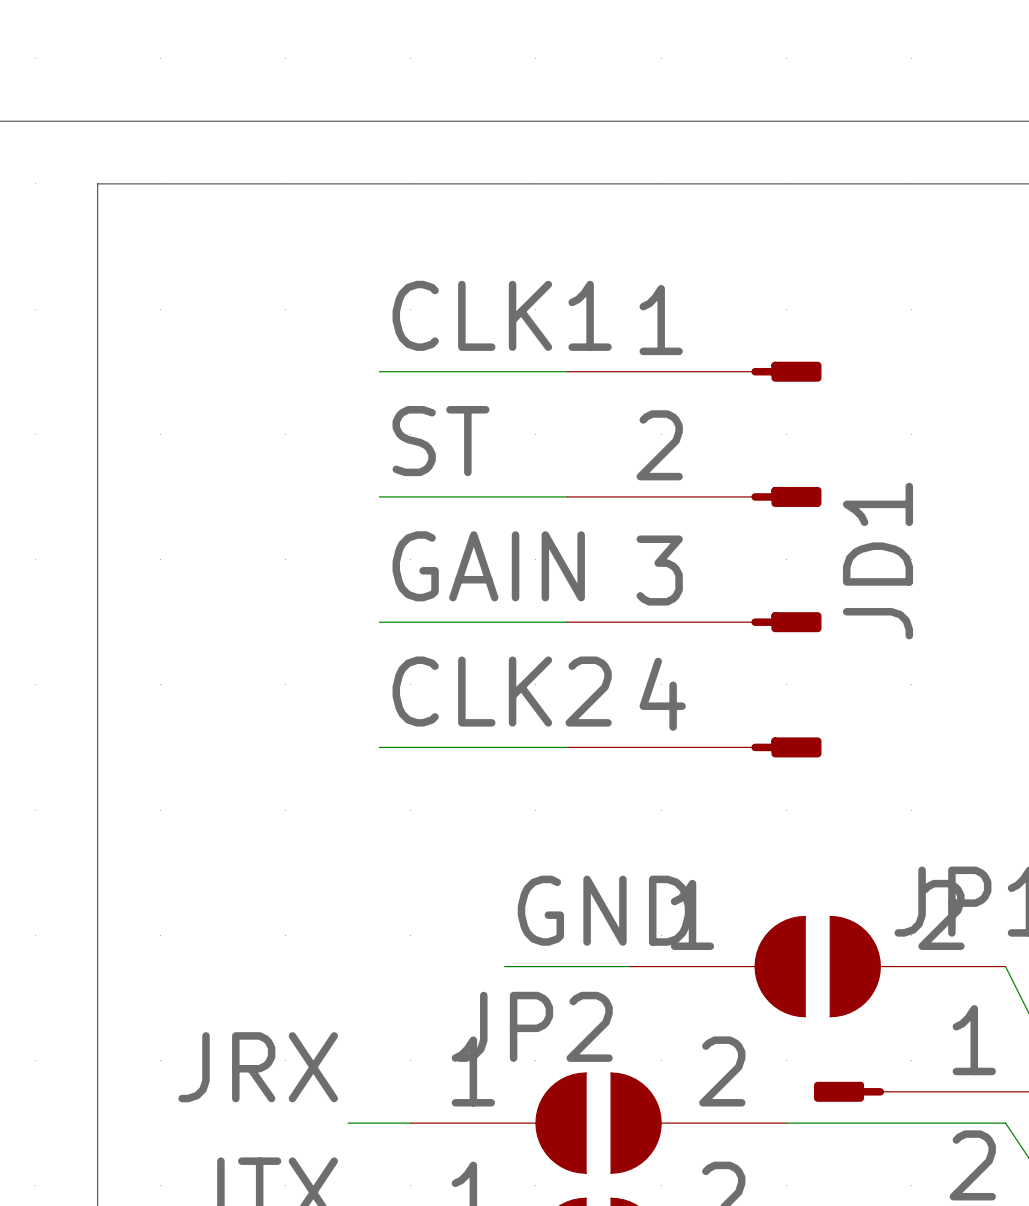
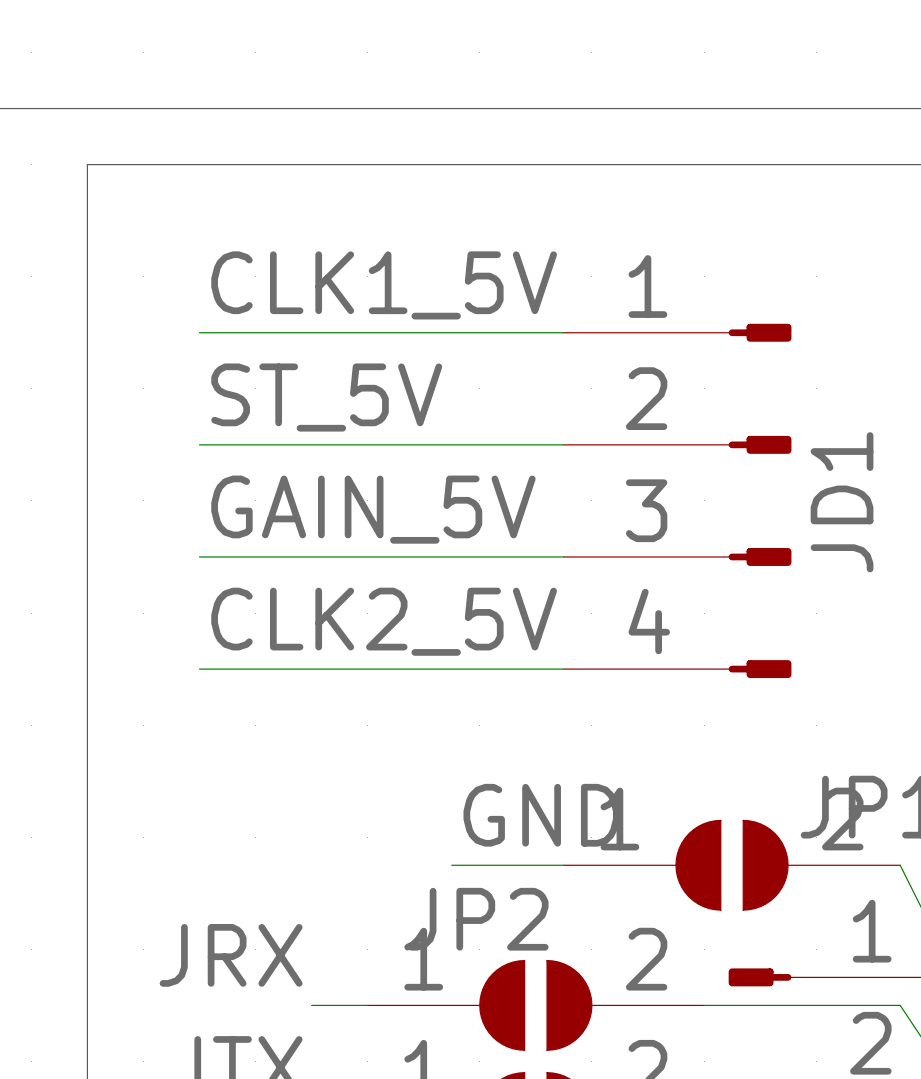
label: CLK1 (502, 315) -> CLK1_5V (384, 285)
wire: none -> (199, 332) (339, 332)
label: ST (441, 441) -> none
label: none -> ST_5V (326, 397)
wire: none -> (199, 444) (339, 444)
JD1 position: (694, 559) -> (677, 500)
label: GAIN (488, 566) -> GAIN_5V (373, 509)
wire: none -> (199, 556) (339, 556)
label: CLK2 (502, 691) -> CLK2_5V (384, 621)
wire: none -> (199, 669) (339, 669)

